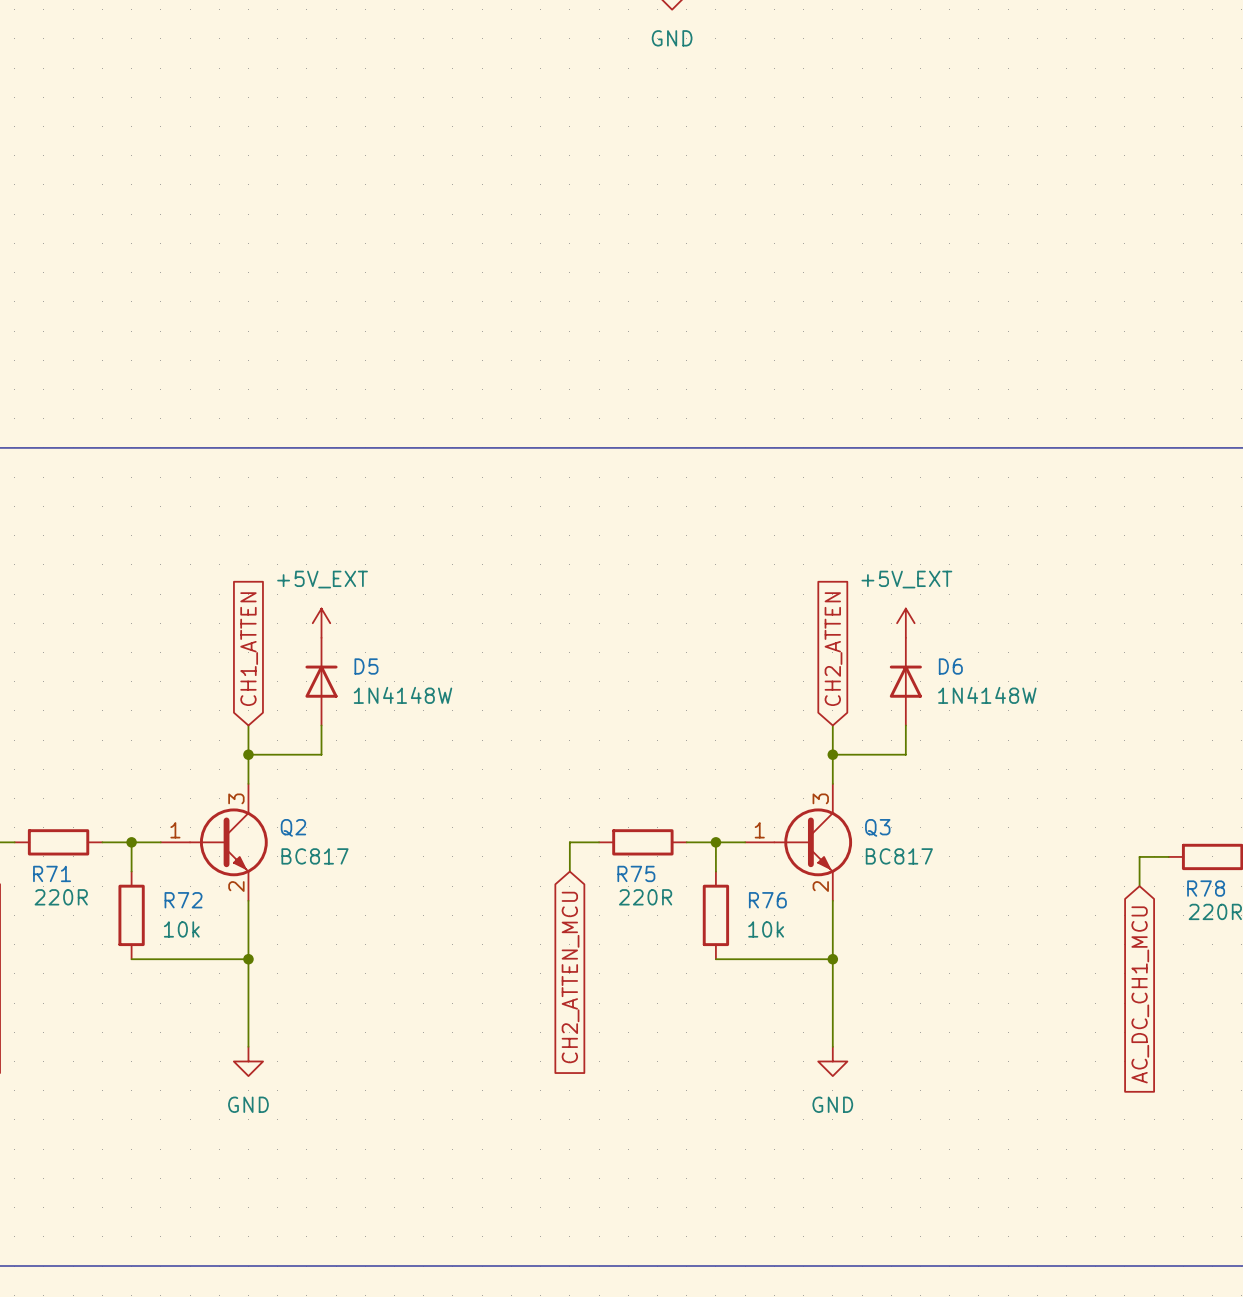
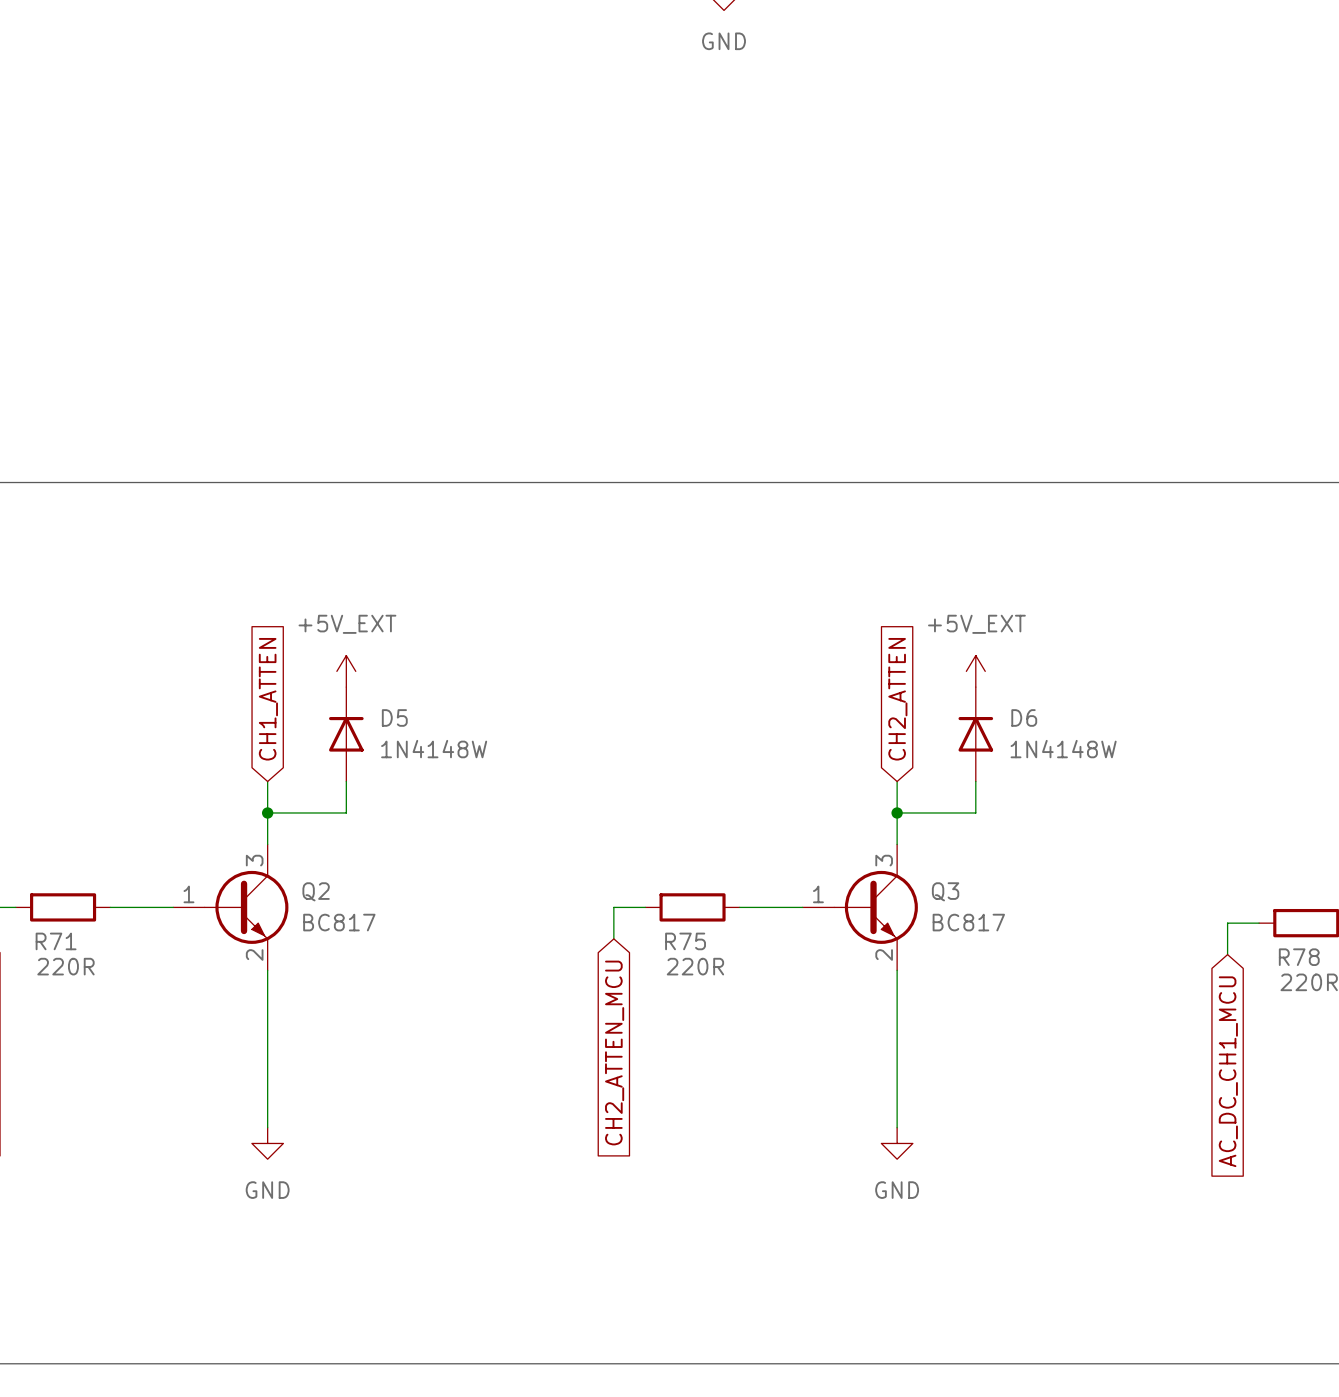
wire: (131, 842) (131, 871) -> none
junction: (131, 842) -> none
wire: (715, 842) (715, 871) -> none
junction: (715, 842) -> none
R72: 10k (131, 915) -> none
R76: 10k (715, 915) -> none
wire: (131, 959) (248, 959) -> none
junction: (248, 959) -> none
wire: (715, 959) (832, 959) -> none
junction: (832, 959) -> none

